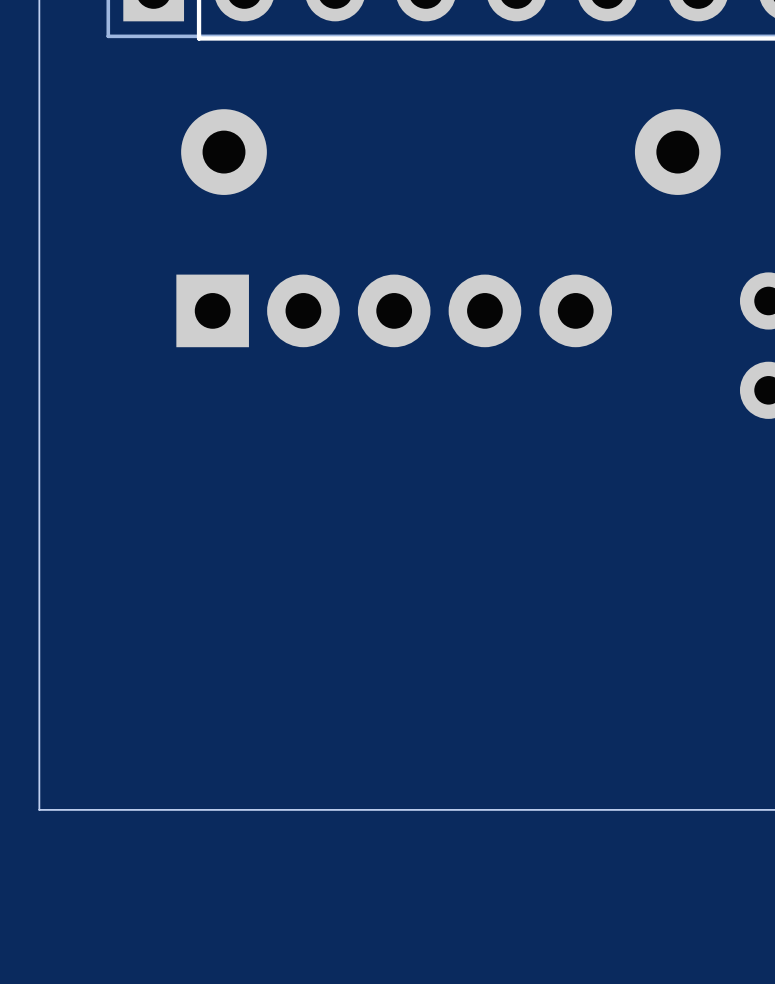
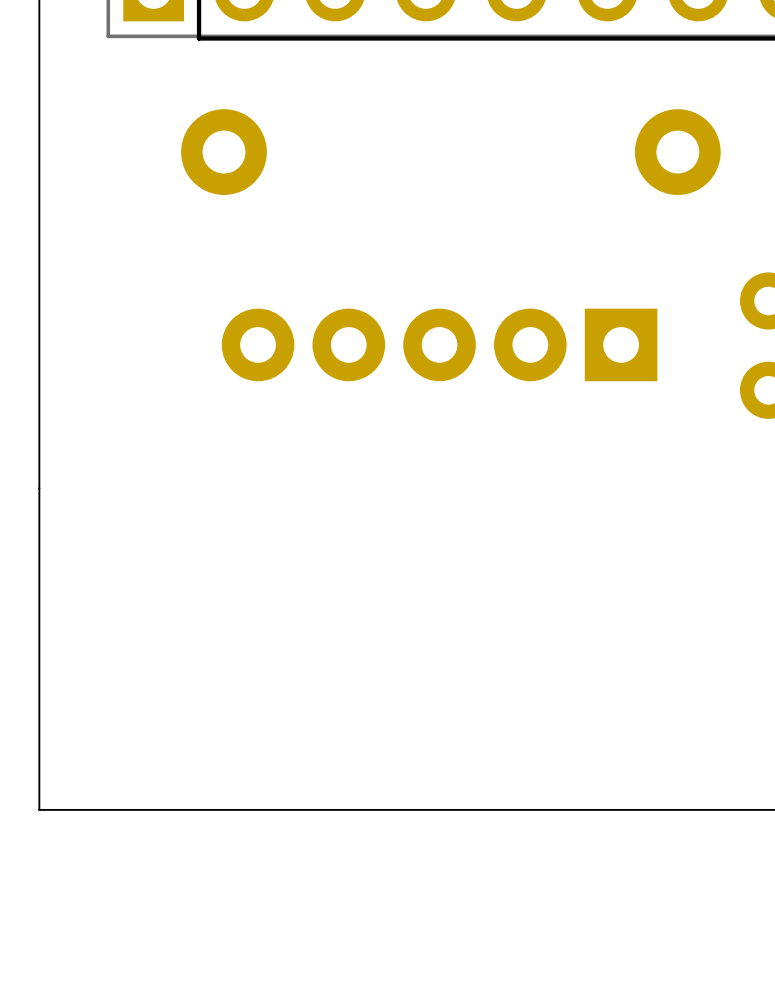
part rotation: 0° (394, 310) -> 180° (439, 344)

